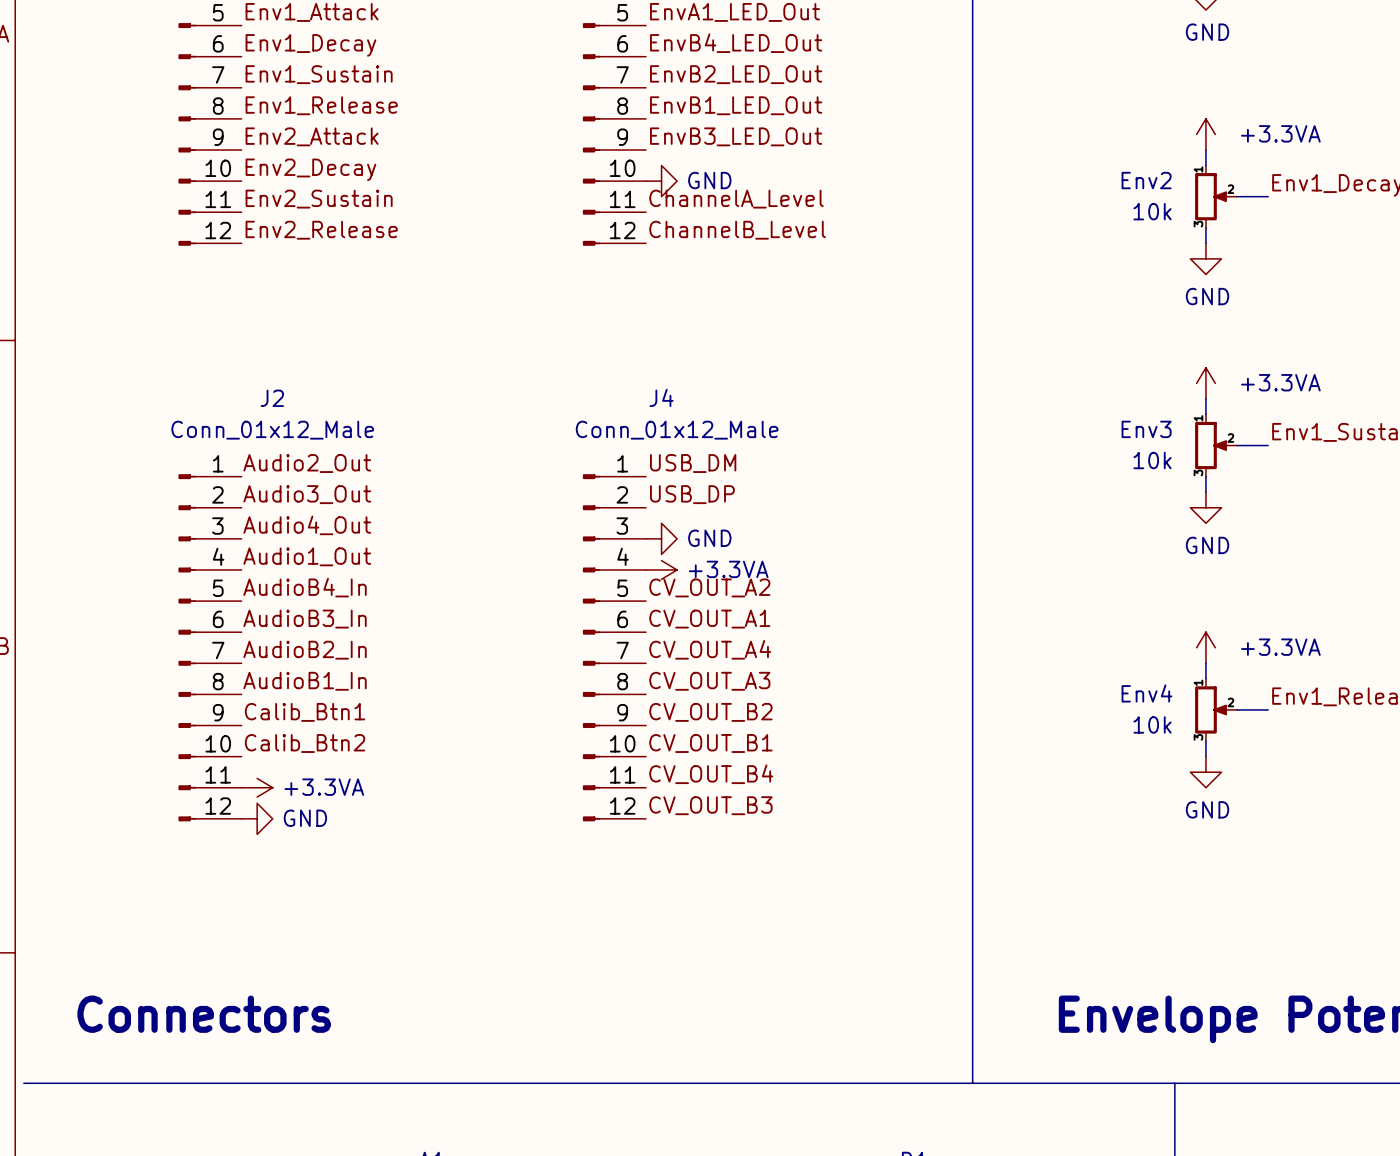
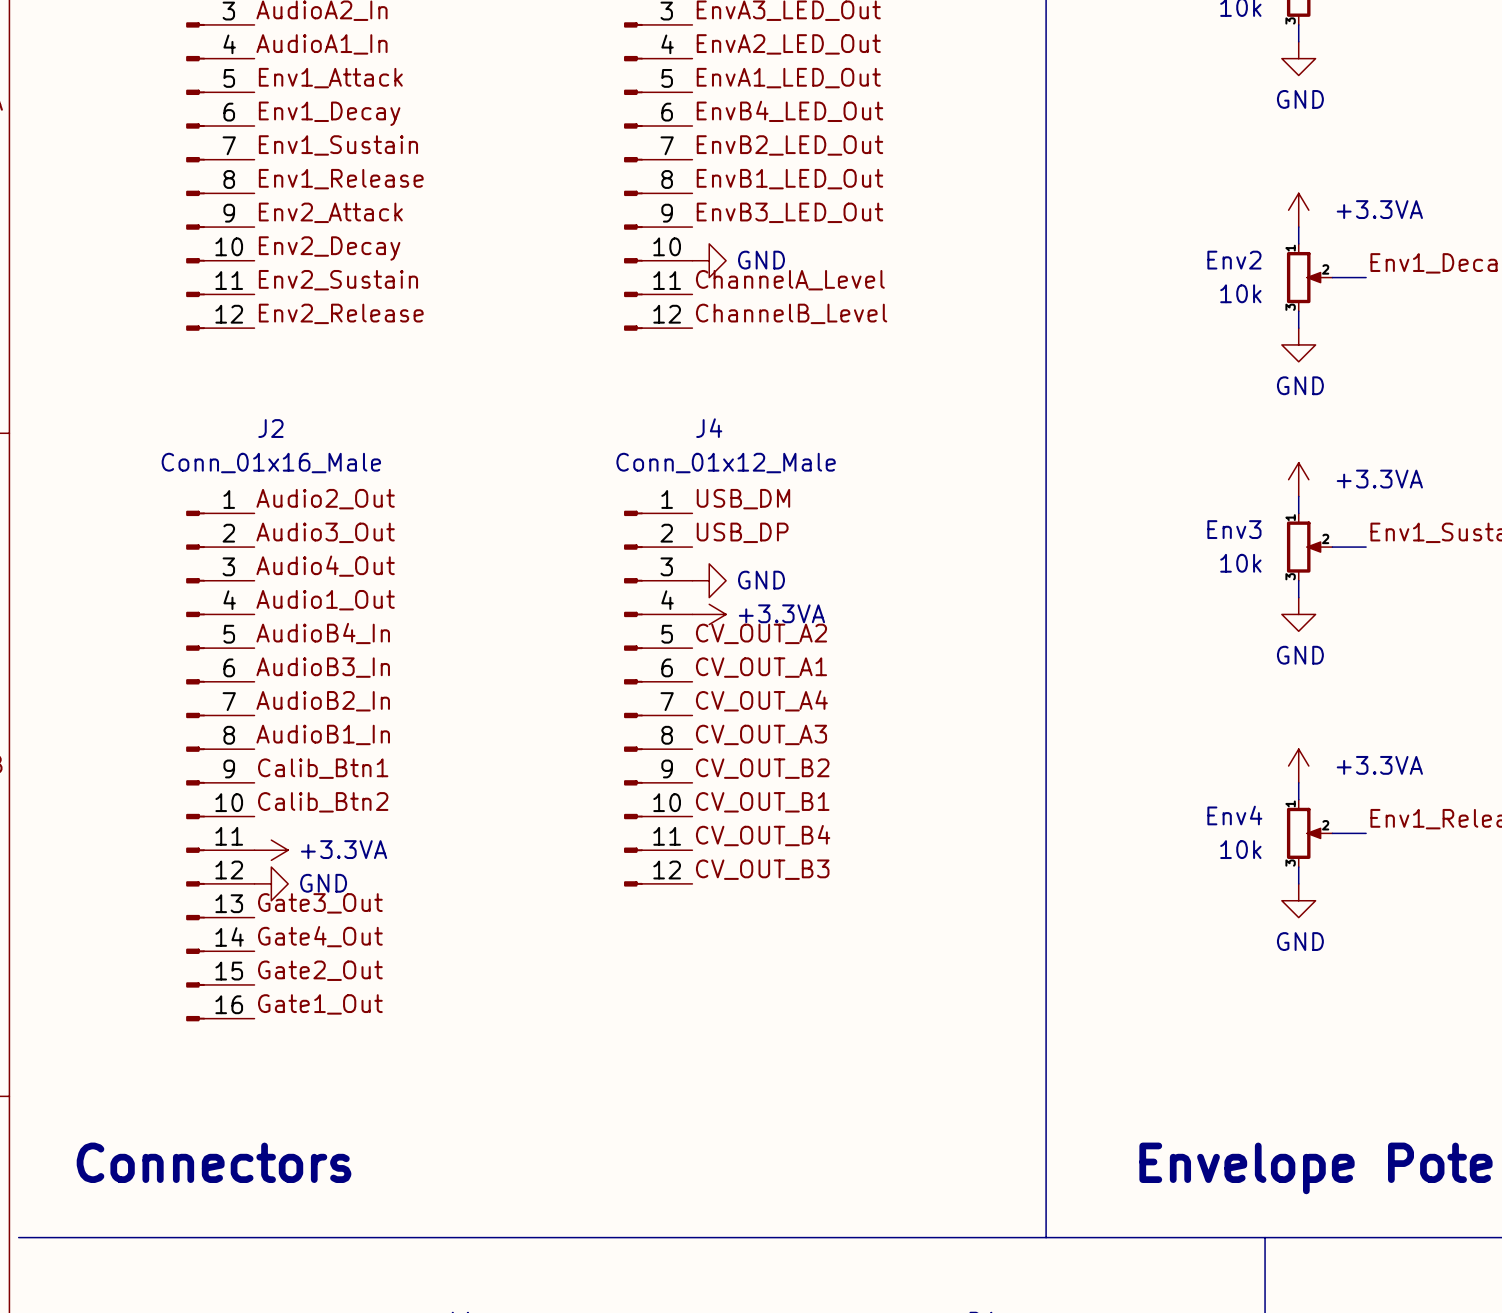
J2 name position: J2 (272, 398) -> J2 (270, 428)
label: none -> Audio2_Out (325, 499)
J2 value: Conn_01x12_Male (272, 430) -> Conn_01x16_Male (271, 463)
label: none -> Audio3_Out (325, 532)
label: Audio2_Out (307, 463) -> Audio4_Out (325, 566)
label position: USB_DM (693, 463) -> USB_DM (743, 499)
J2 symbol: [178, 474, 242, 822] -> [186, 510, 255, 1022]
label: Audio3_Out (307, 494) -> Audio1_Out (325, 600)
label position: USB_DP (692, 494) -> USB_DP (742, 532)
label: Audio4_Out (307, 525) -> AudioB4_In (323, 633)
label: none -> CV_OUT_A2 (761, 633)
power symbol position: GND (661, 538) -> GND (709, 580)
label: Audio1_Out (307, 556) -> AudioB3_In (323, 667)
label: none -> CV_OUT_A1 (761, 667)
power symbol position: +3.3VA (661, 569) -> +3.3VA (709, 614)
label: AudioB4_In (305, 587) -> AudioB2_In (323, 701)
label: CV_OUT_A2 (709, 587) -> CV_OUT_A4 (761, 700)
label: AudioB3_In (305, 619) -> AudioB1_In (323, 734)
label: CV_OUT_A1 (709, 619) -> CV_OUT_A3 (761, 734)
J4 position: (614, 647) -> (658, 698)
label: CV_OUT_A4 (710, 649) -> CV_OUT_B2 (762, 768)
label: AudioB2_In (305, 650) -> Calib_Btn1 (323, 768)
label: AudioB1_In (305, 681) -> Calib_Btn2 (323, 802)
label: CV_OUT_A3 (709, 681) -> CV_OUT_B1 (762, 802)
label: Calib_Btn1 (305, 712) -> none
label: CV_OUT_B2 (710, 712) -> CV_OUT_B4 (763, 835)
label: Calib_Btn2 (305, 743) -> none
label: CV_OUT_B1 (710, 743) -> CV_OUT_B3 (762, 869)
label: none -> Gate3_Out (320, 903)
label: CV_OUT_B4 (711, 774) -> none
power symbol position: +3.3VA (257, 787) -> +3.3VA (271, 850)
label: none -> Gate4_Out (320, 936)
label: CV_OUT_B3 (710, 805) -> none
power symbol position: GND (257, 818) -> GND (271, 883)
label: none -> Gate2_Out (320, 970)
label: none -> Gate1_Out (320, 1004)

